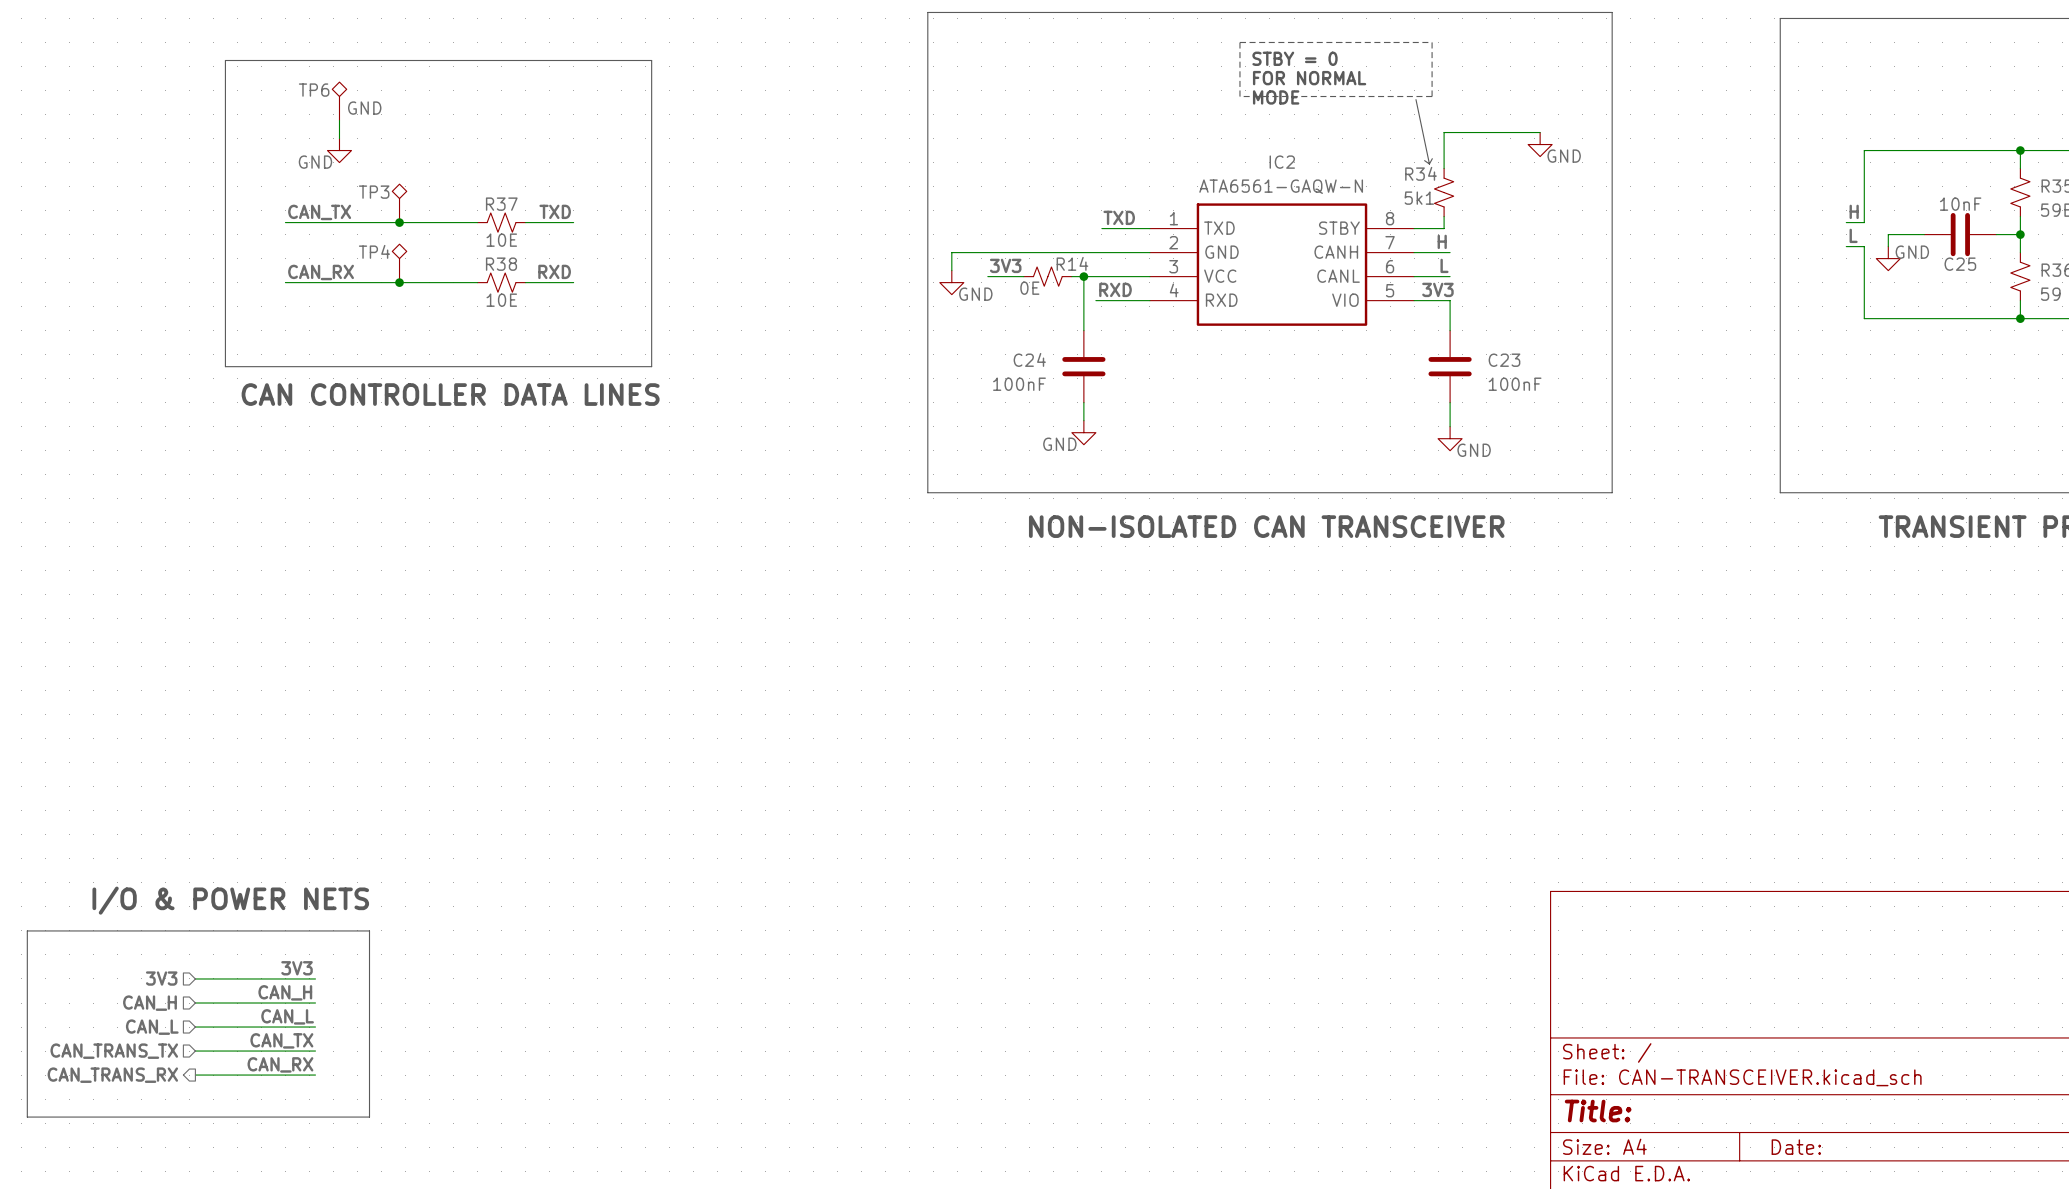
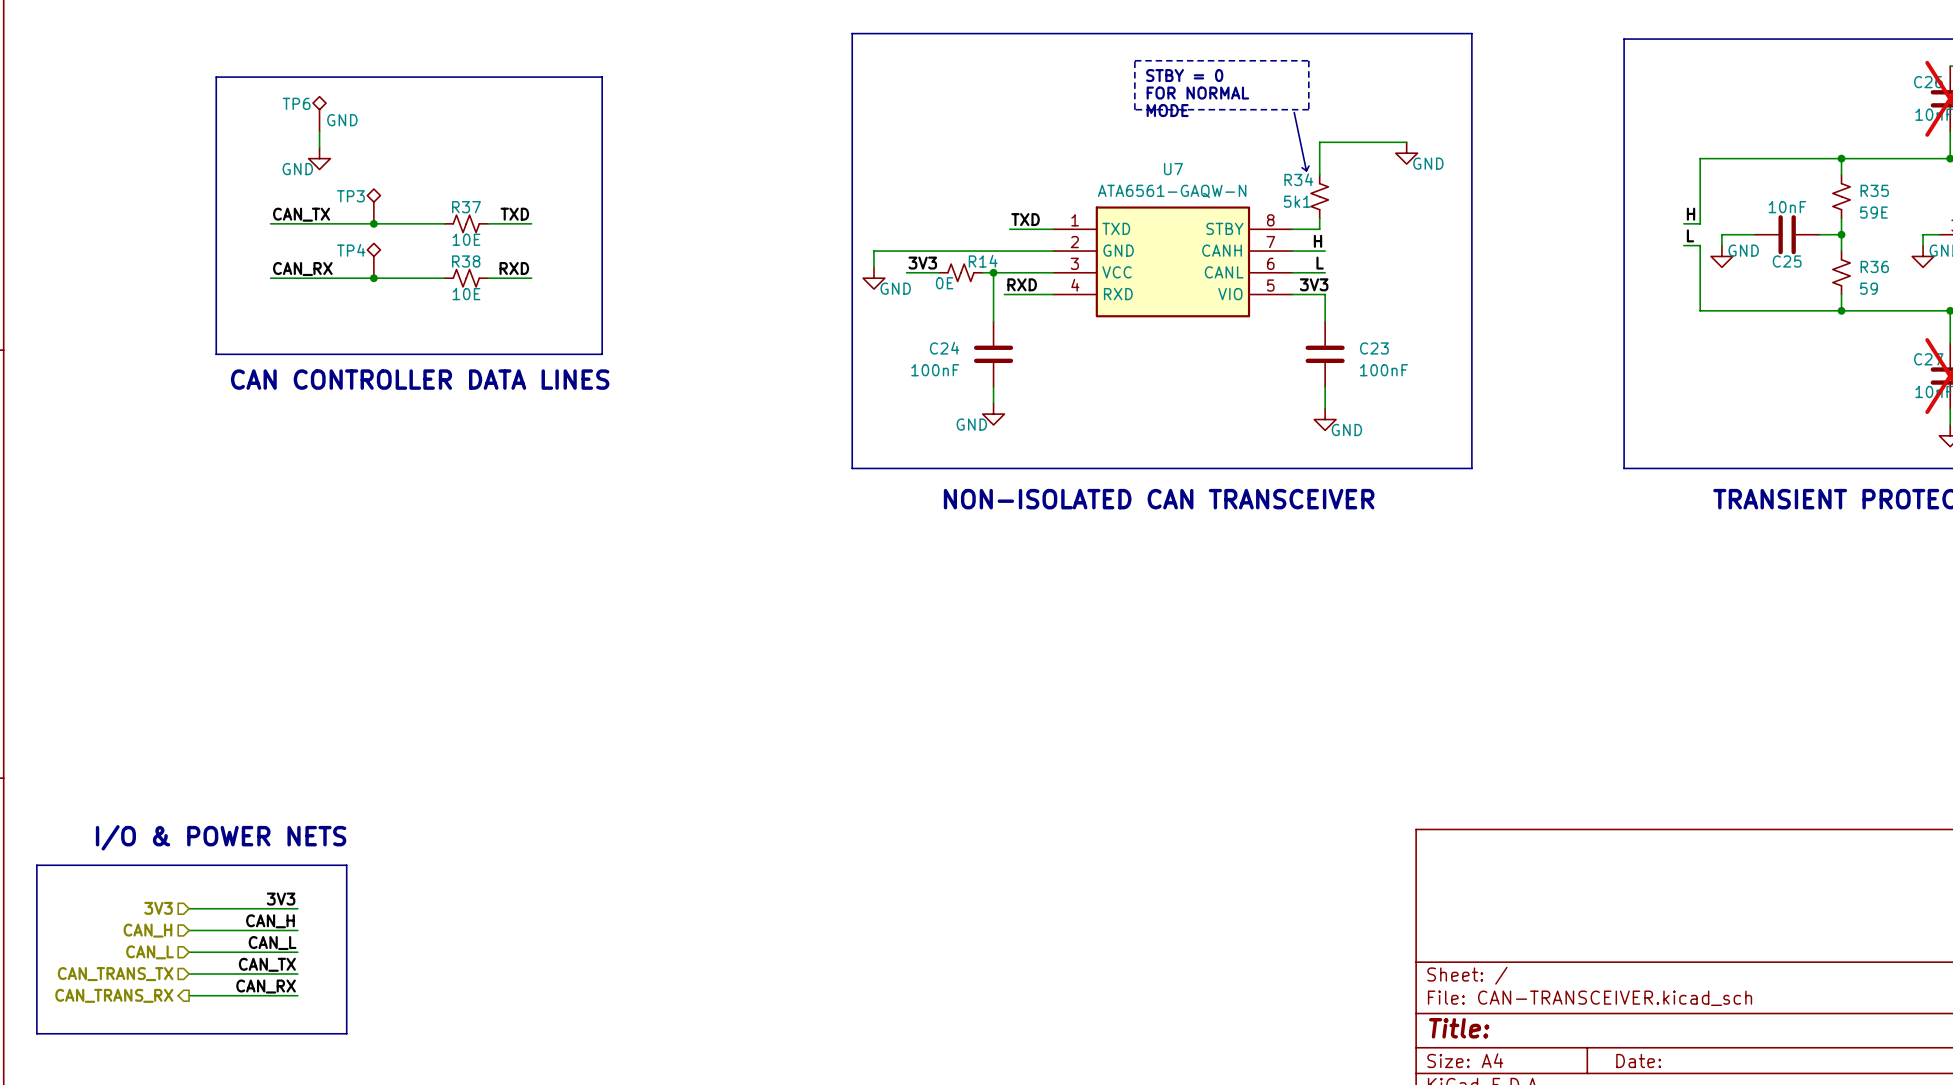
IC2 name: IC2 (1282, 162) -> U7 (1173, 169)

